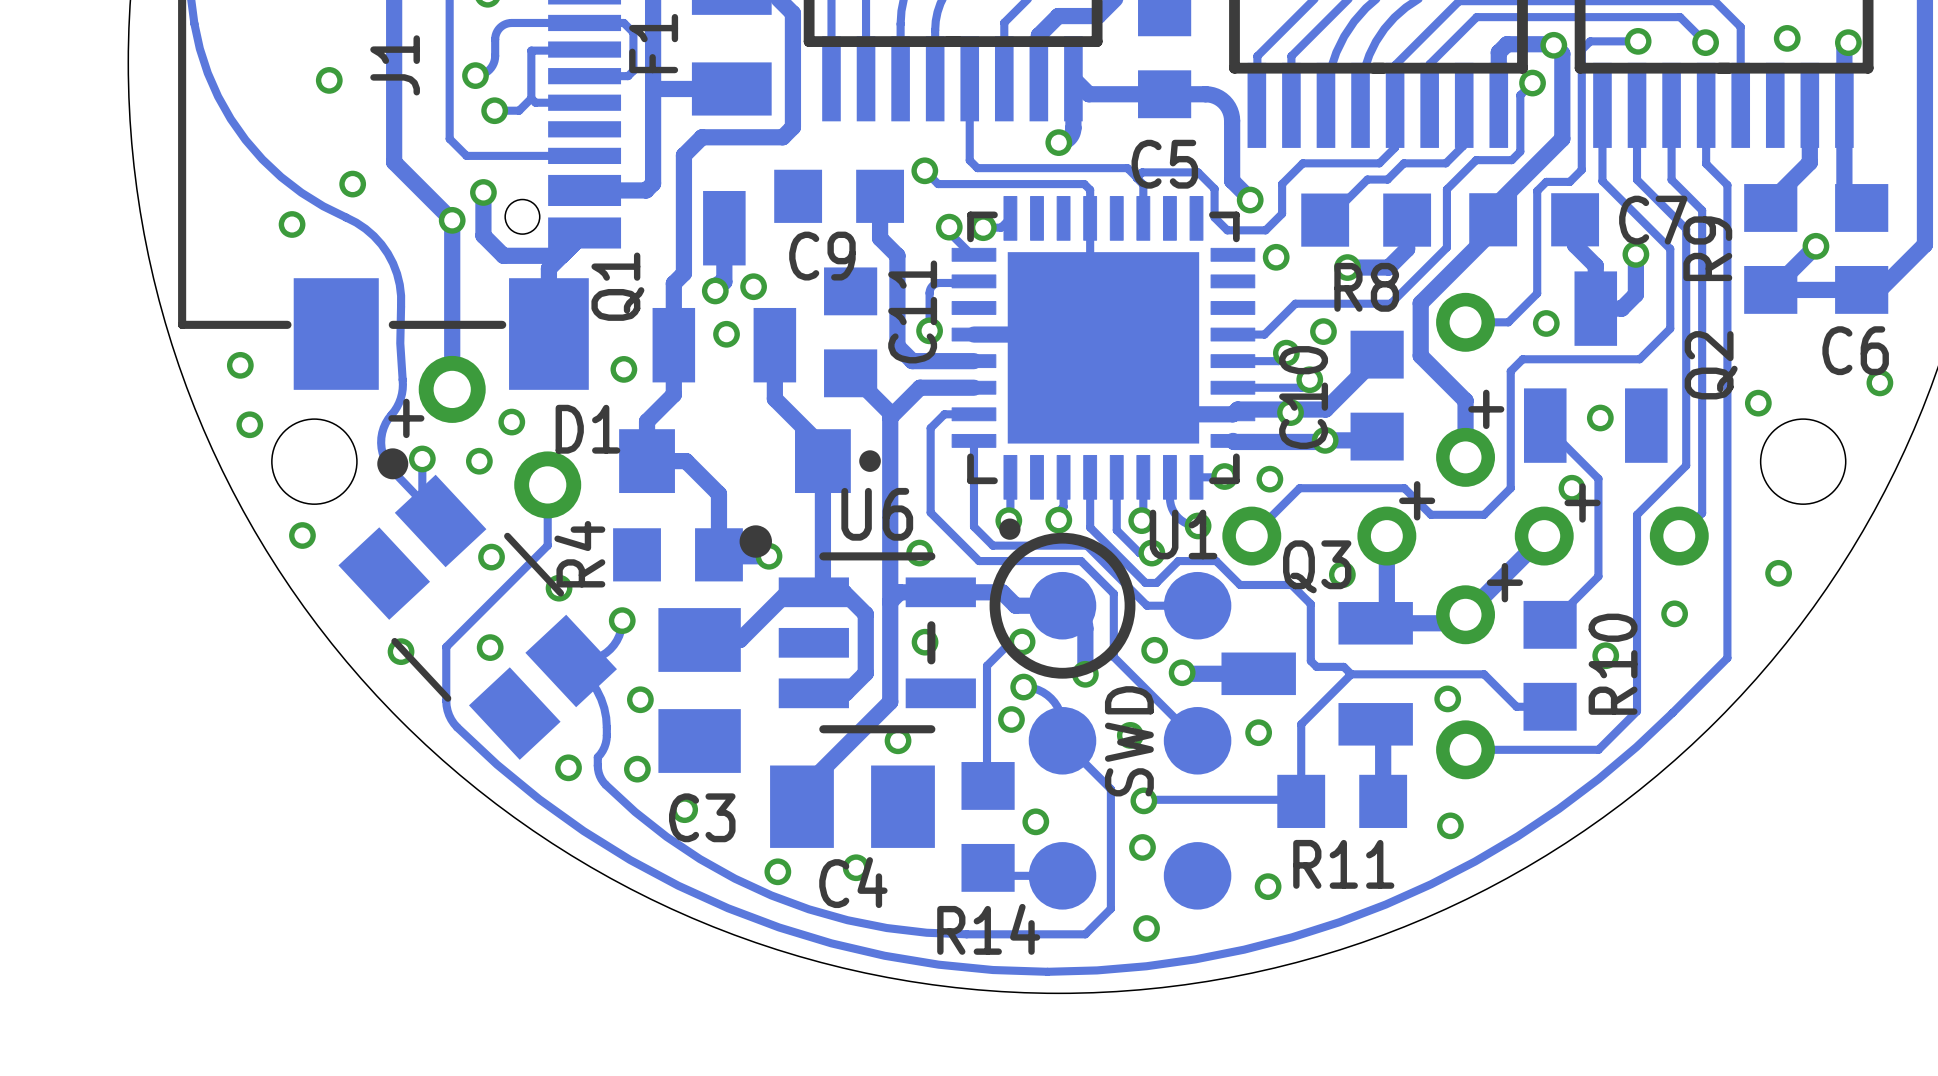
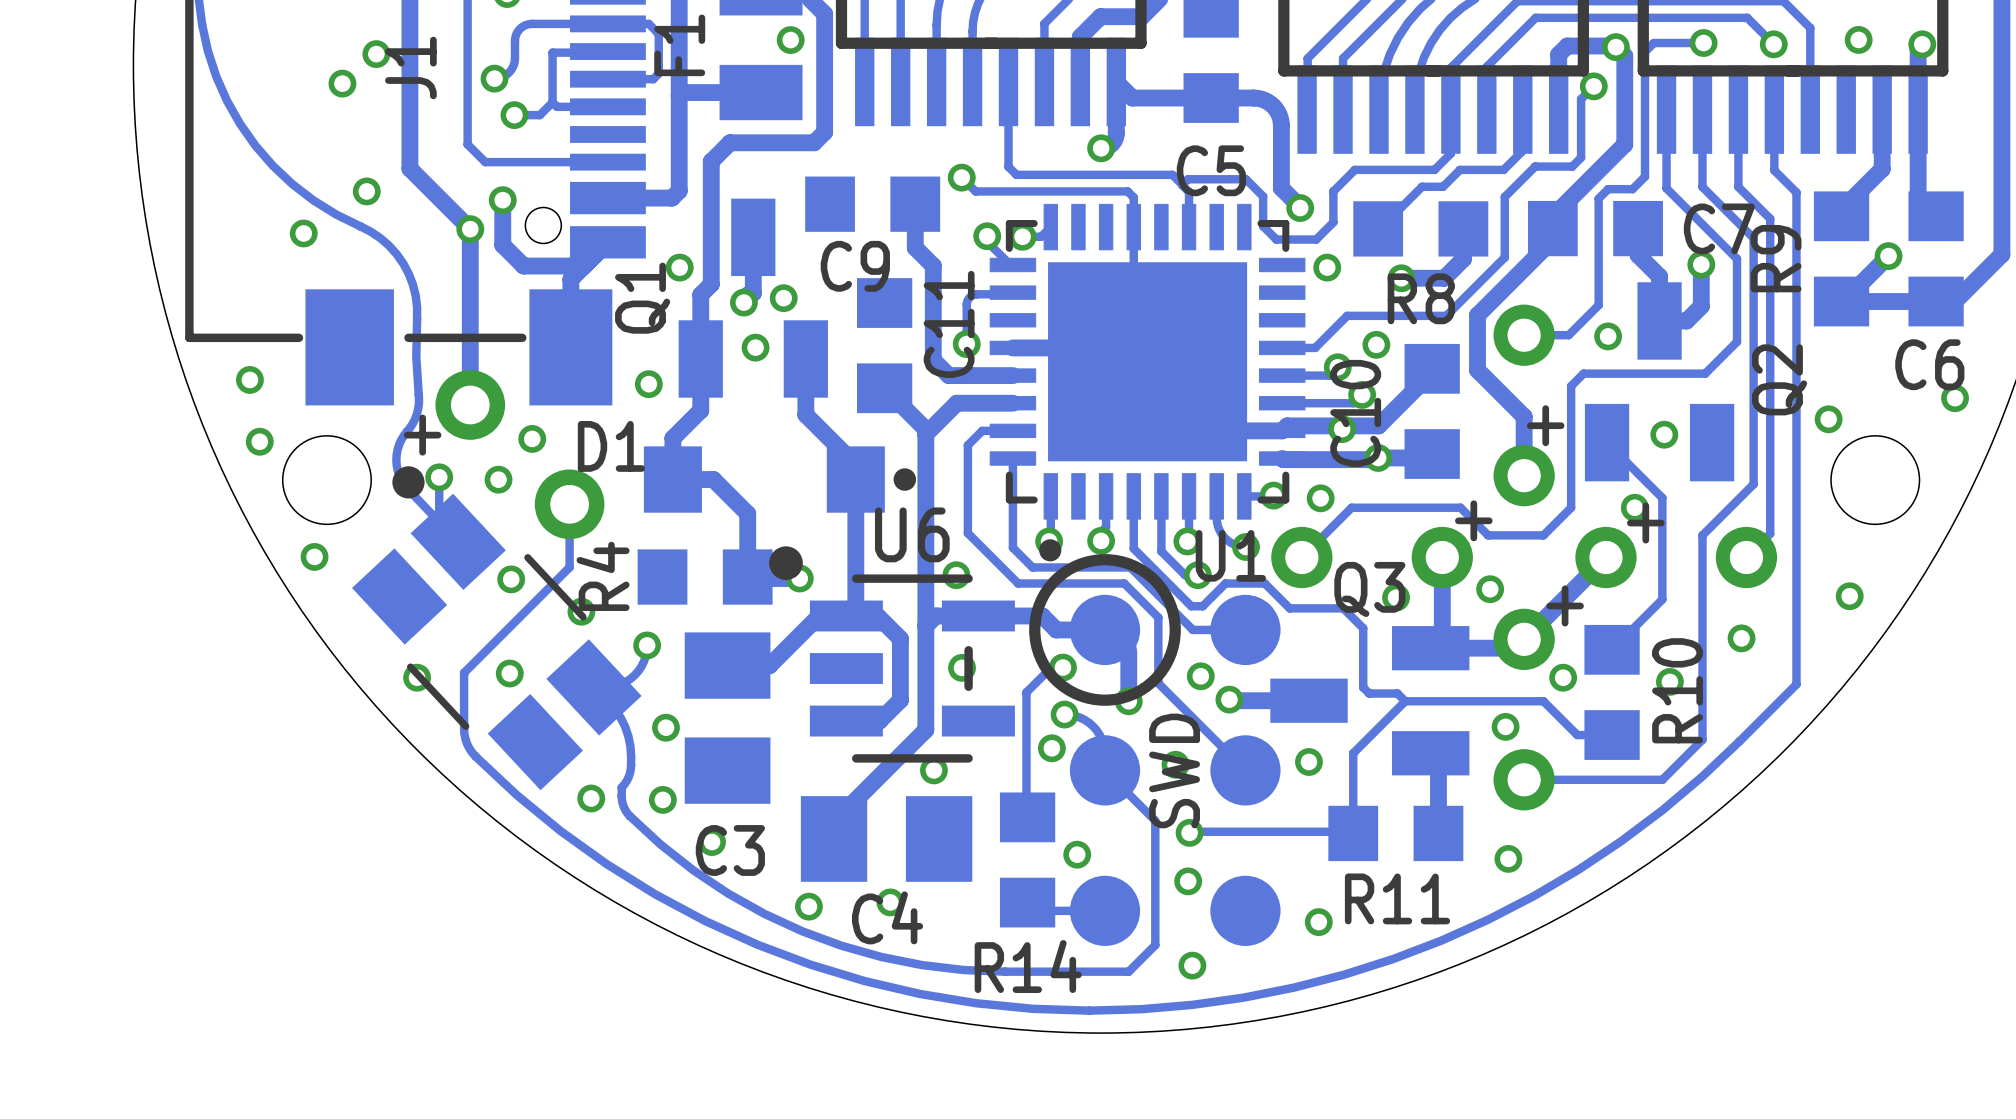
via: none -> (790, 40)
via: none -> (376, 54)
via: none -> (679, 267)
via: none -> (1490, 589)
via: none -> (1563, 677)

